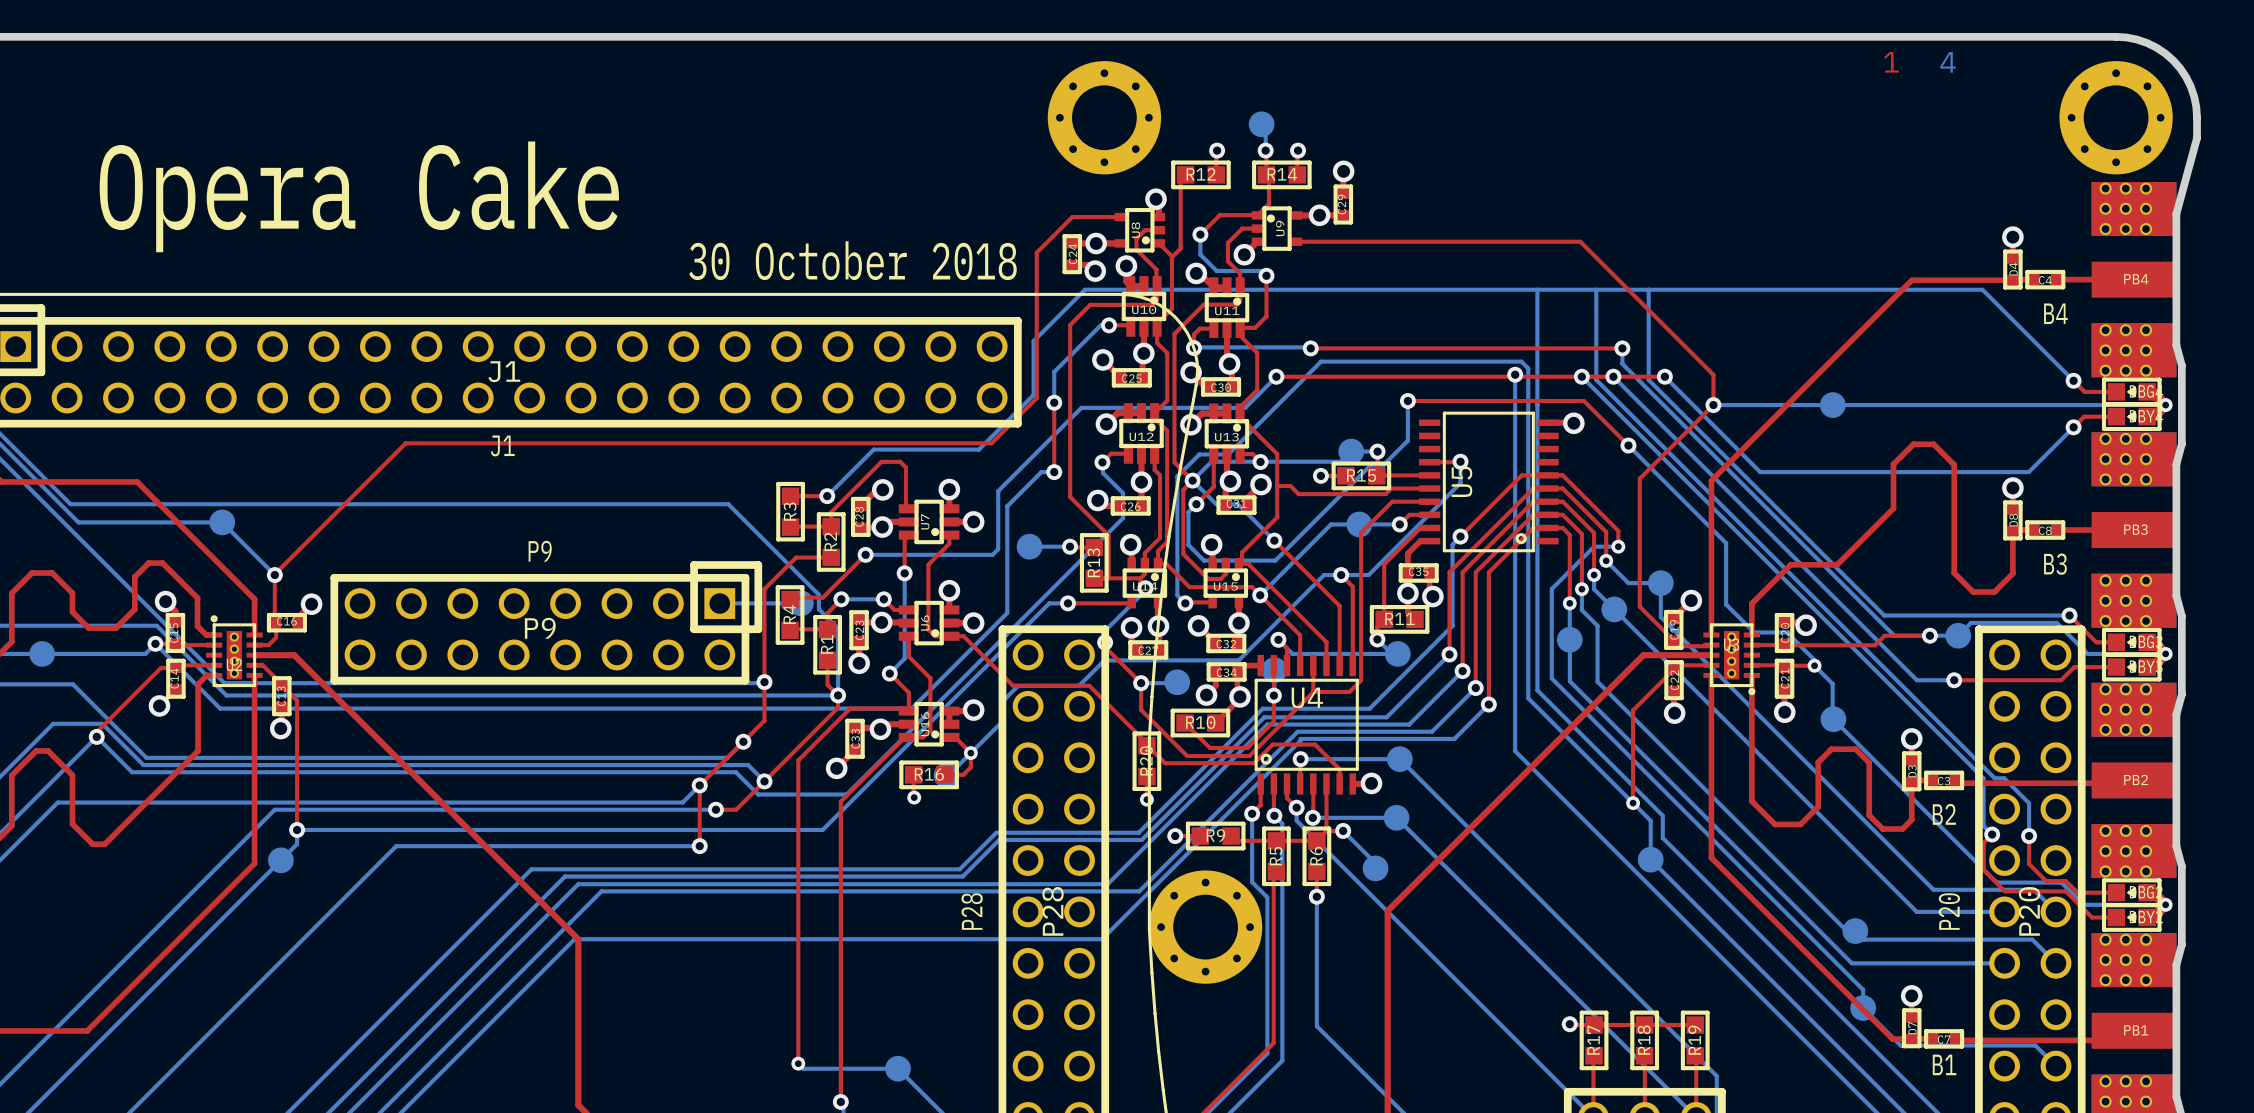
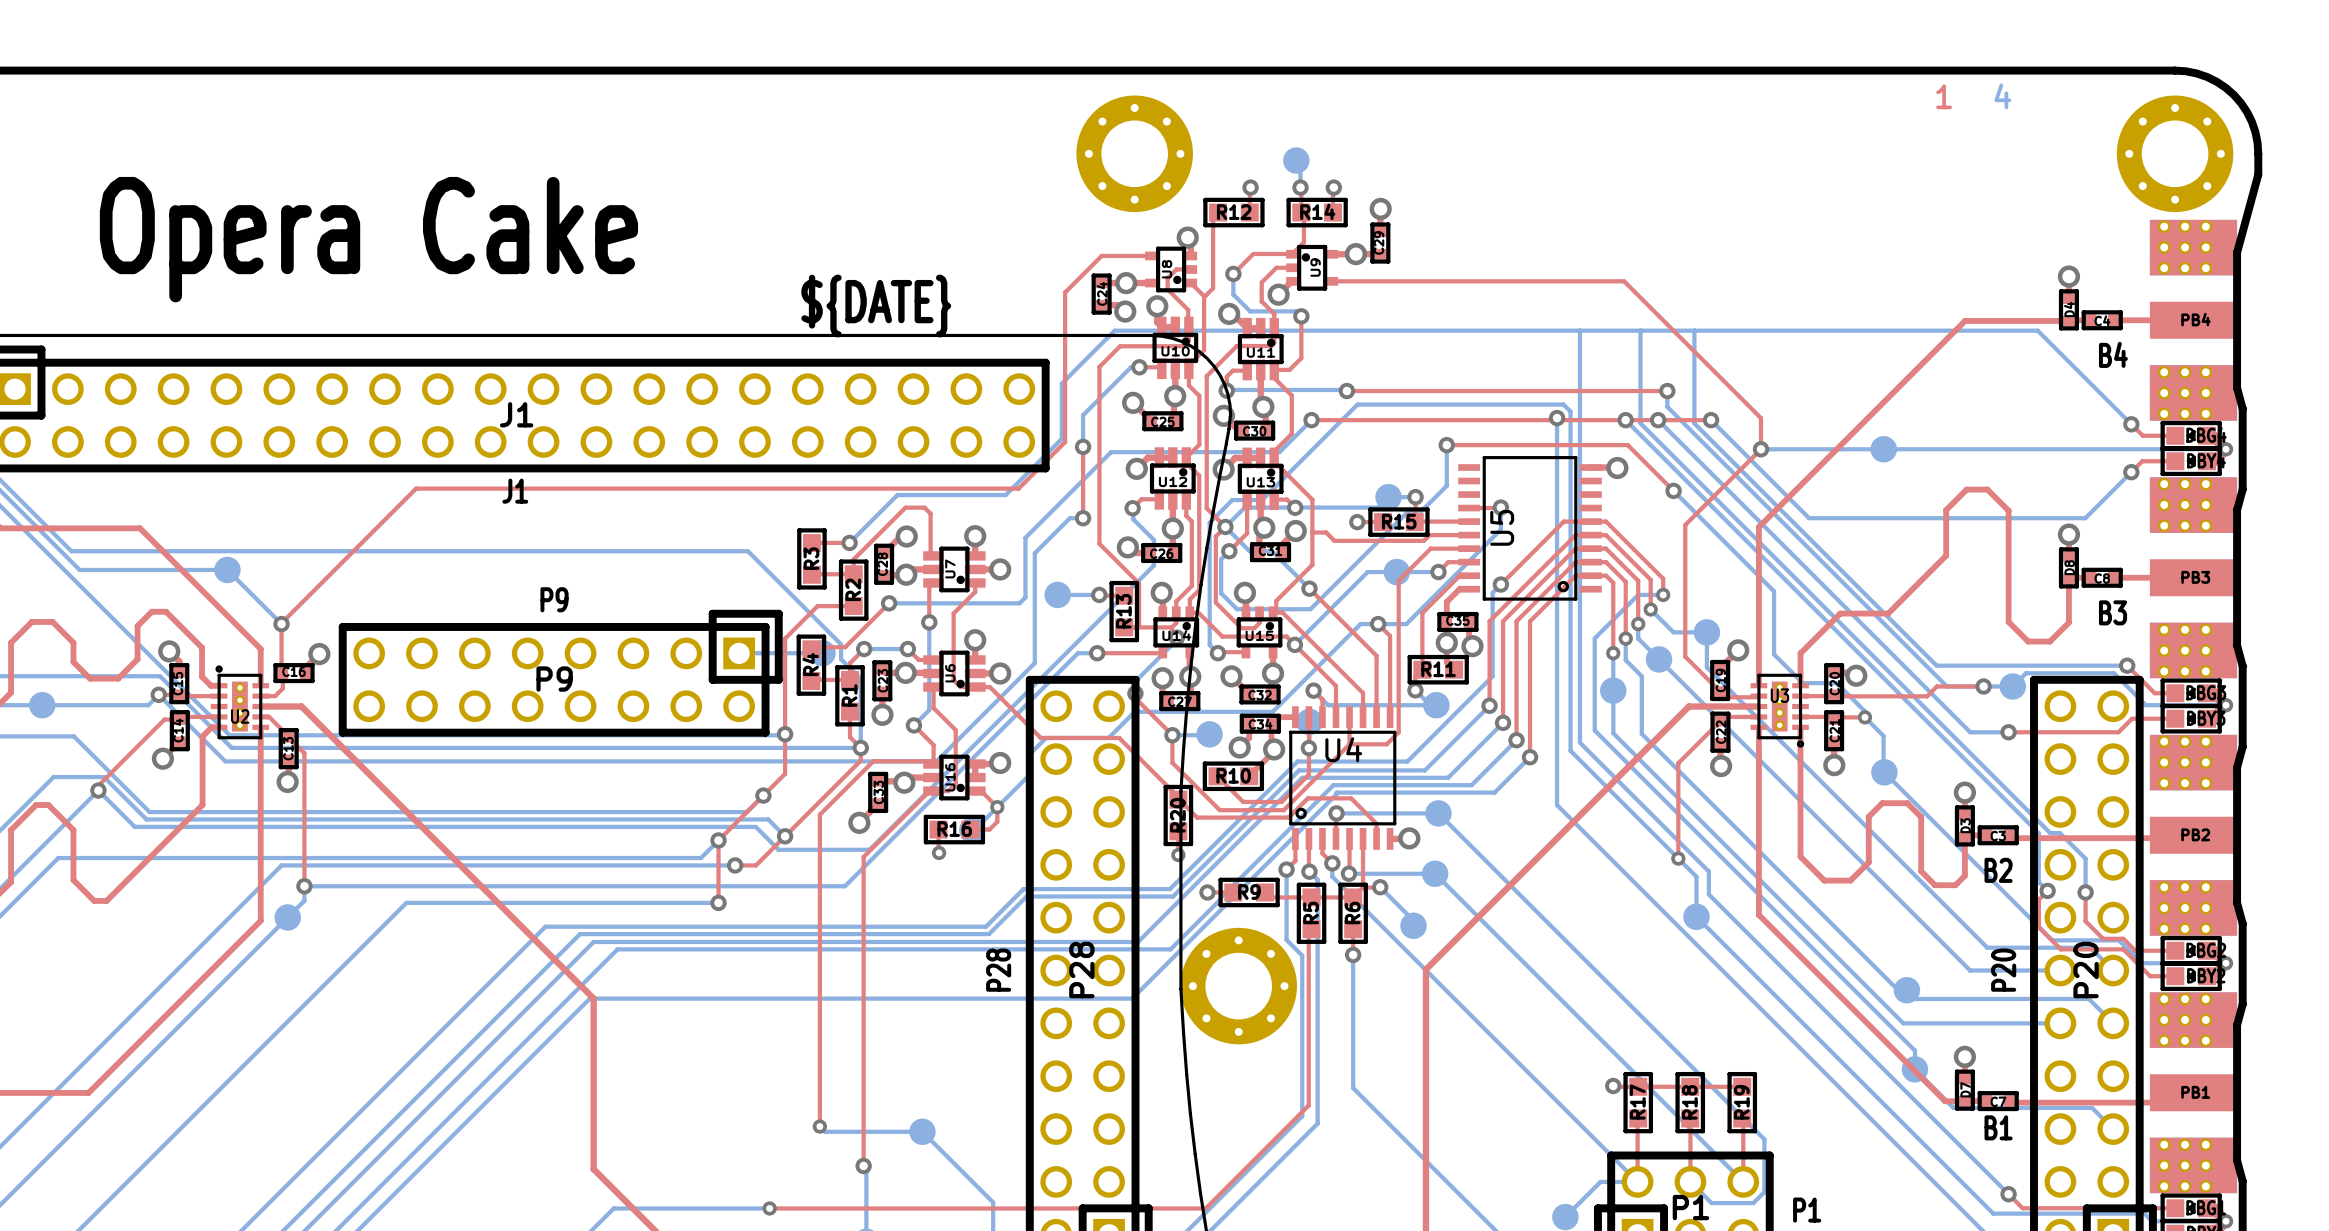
text: 30 October 2018 (852, 260) -> ${DATE} (876, 306)

